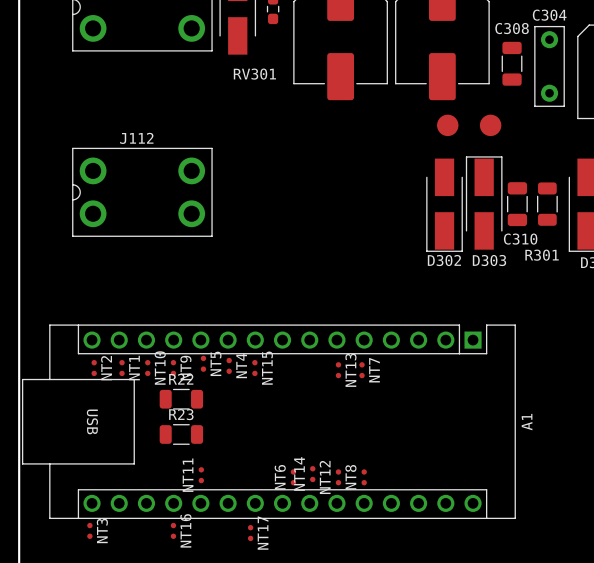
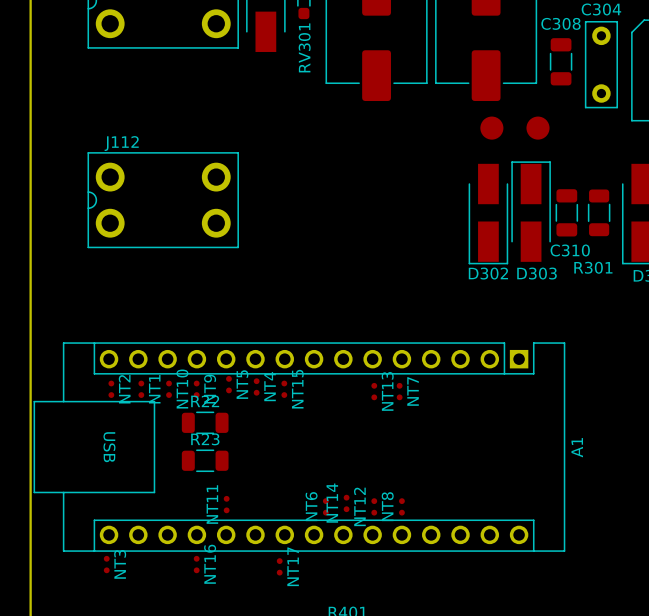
RV301 name rotation: 0° (254, 74) -> 90° counterclockwise (304, 47)
J112 name position: J112 (136, 138) -> J112 (121, 143)

